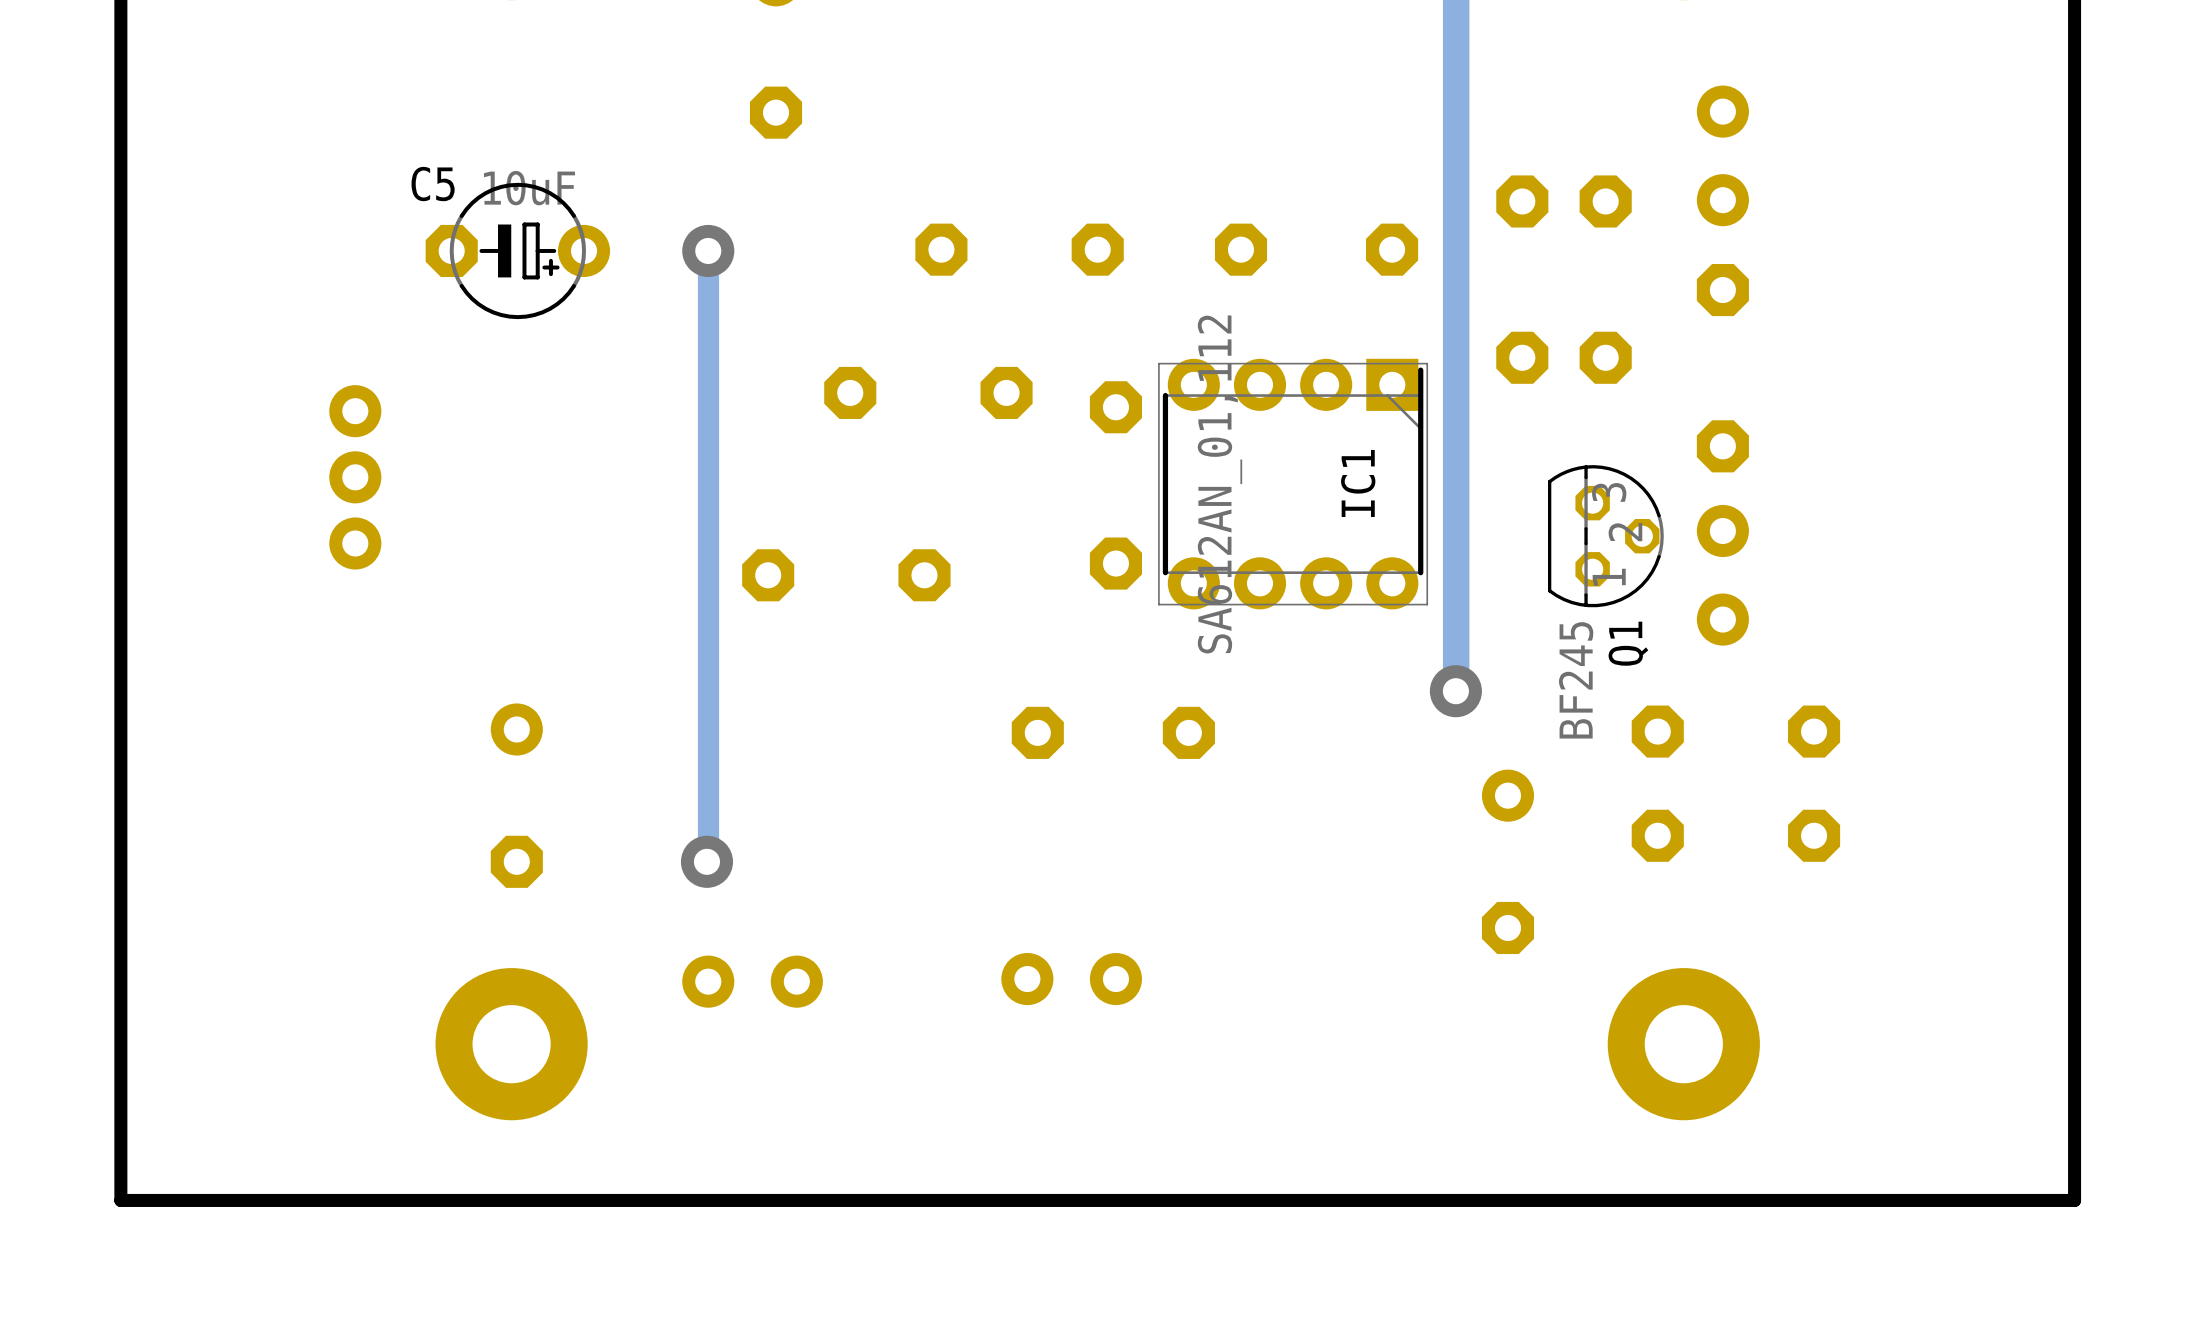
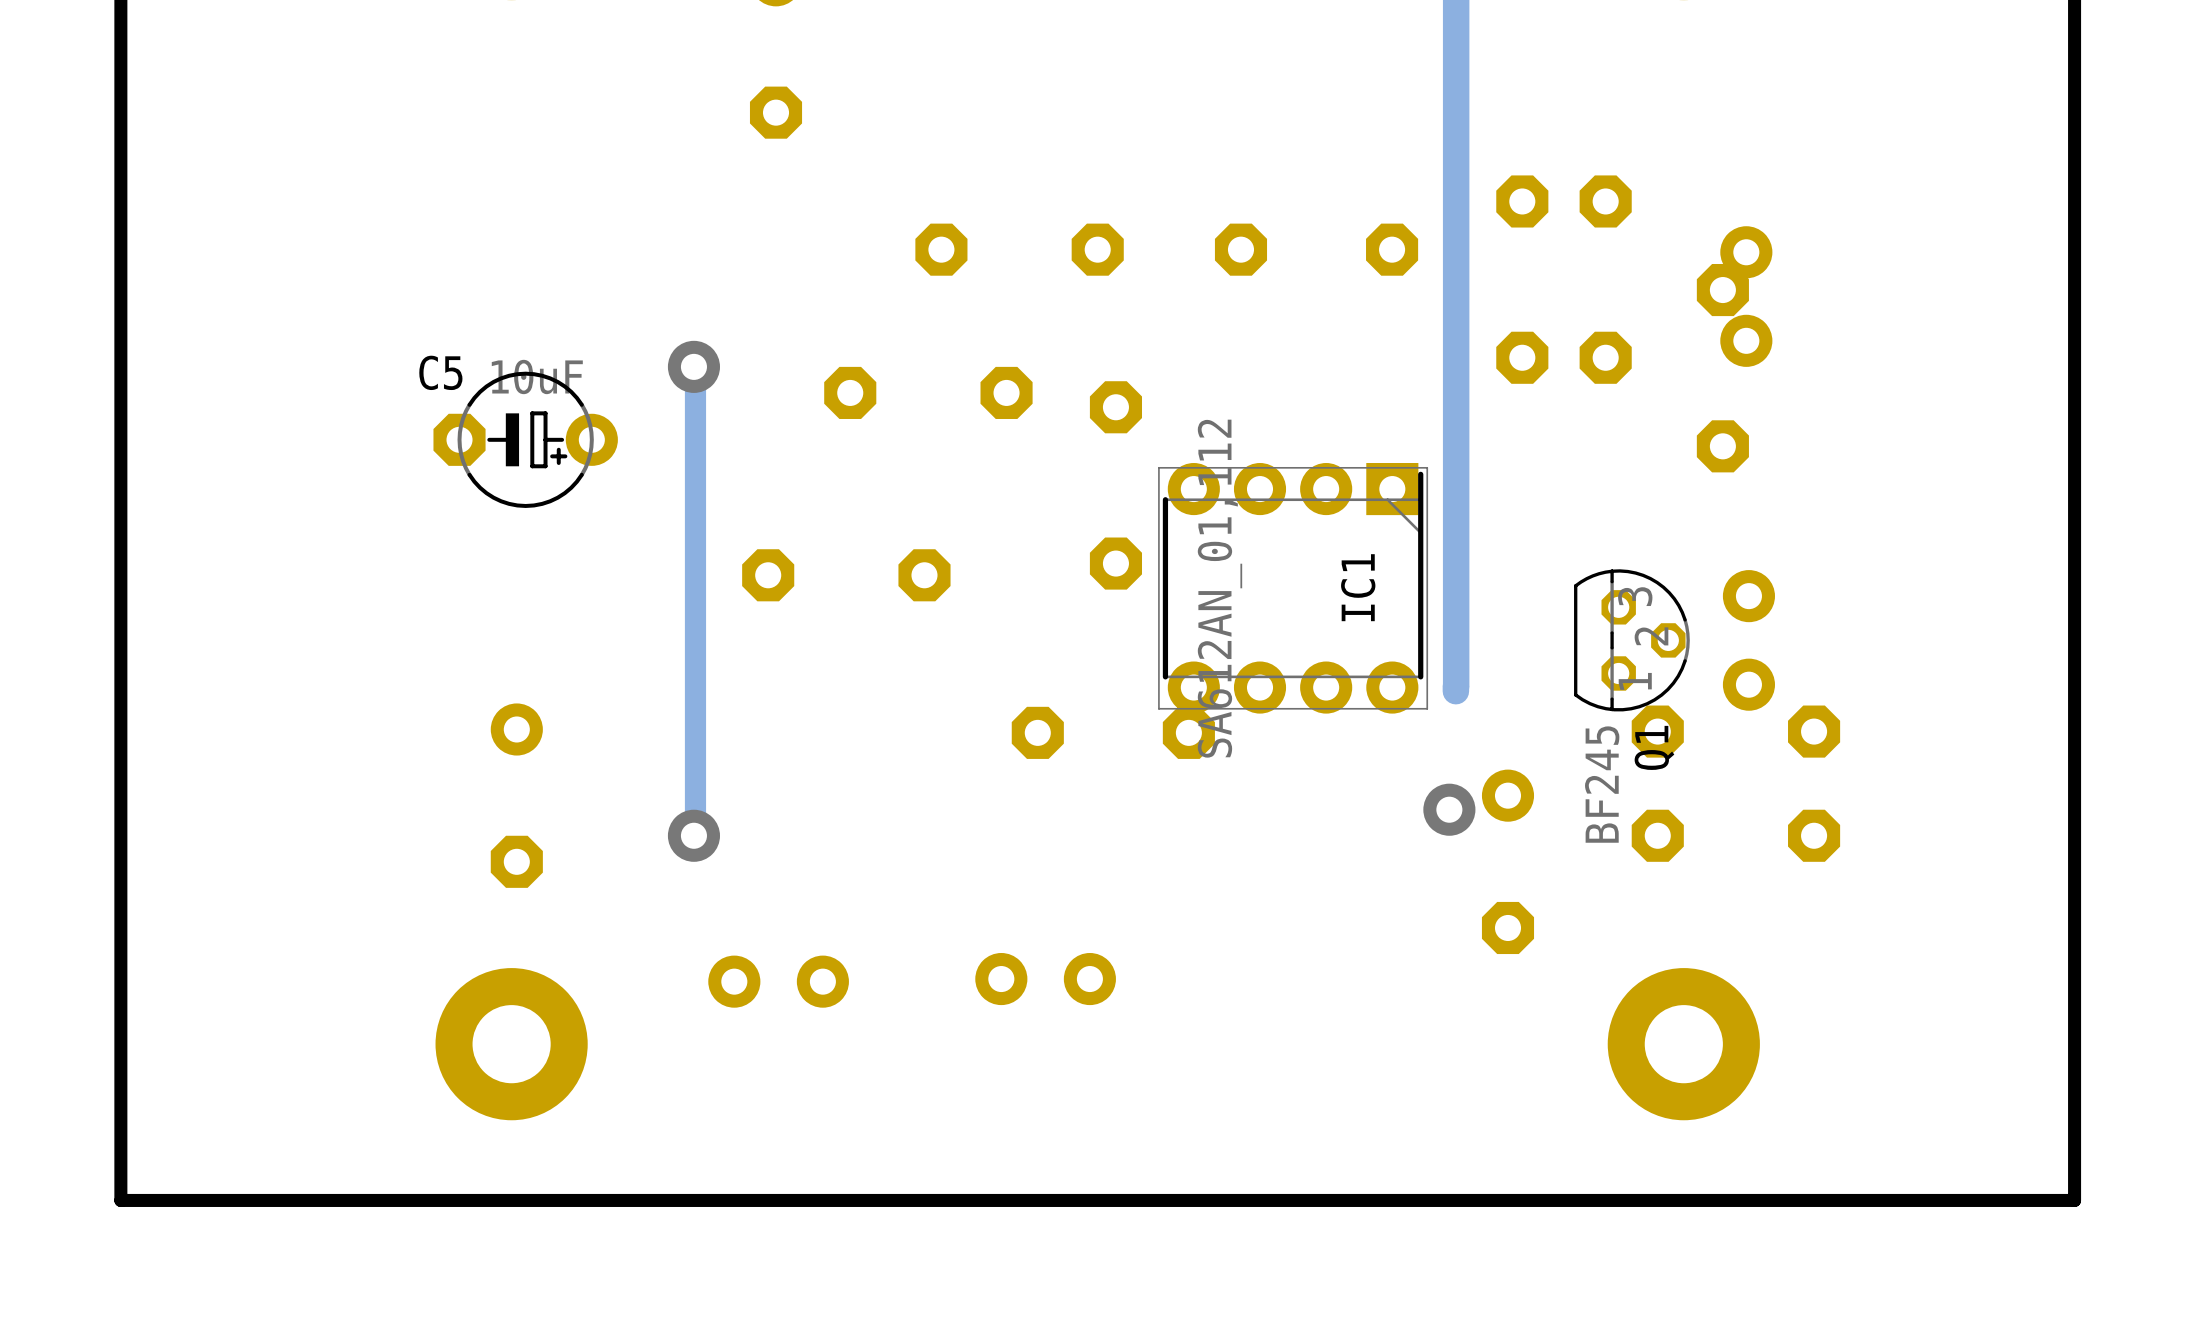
part: (1722, 155) -> none
C5 position: (517, 250) -> (525, 439)
via position: (708, 250) -> (693, 366)
track: (708, 251) (708, 860) (706, 861) -> none
part: none -> (1746, 296)
track: none -> (693, 366) (695, 368) (695, 834) (693, 835)
part: (355, 477) -> none
IC1 position: (1293, 484) -> (1293, 588)
Q1 position: (1605, 536) -> (1631, 640)
part position: (1722, 575) -> (1748, 640)
via position: (1455, 691) -> (1449, 809)
via position: (706, 861) -> (693, 835)
part position: (1071, 979) -> (1045, 979)
part position: (752, 981) -> (778, 981)

